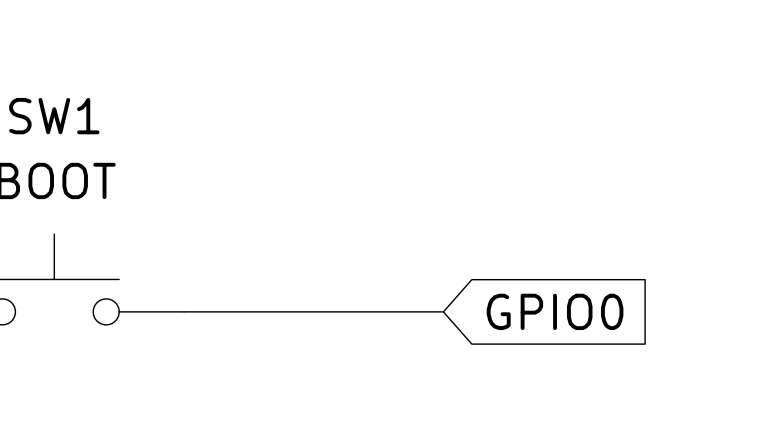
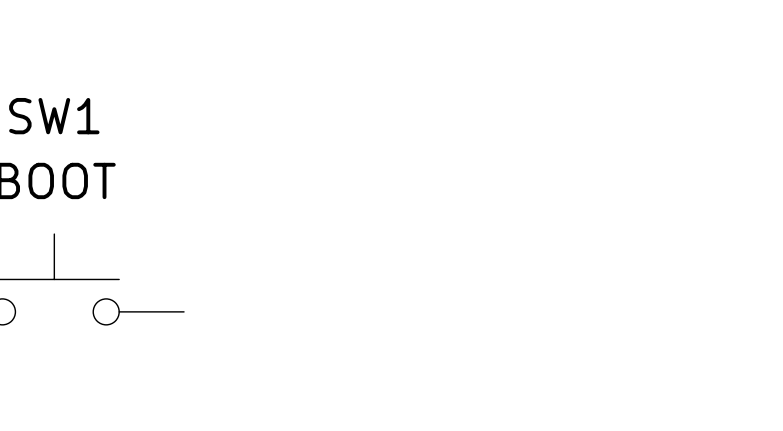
wire: (184, 311) (443, 311) -> none
global label: GPIO0 (555, 311) -> none

